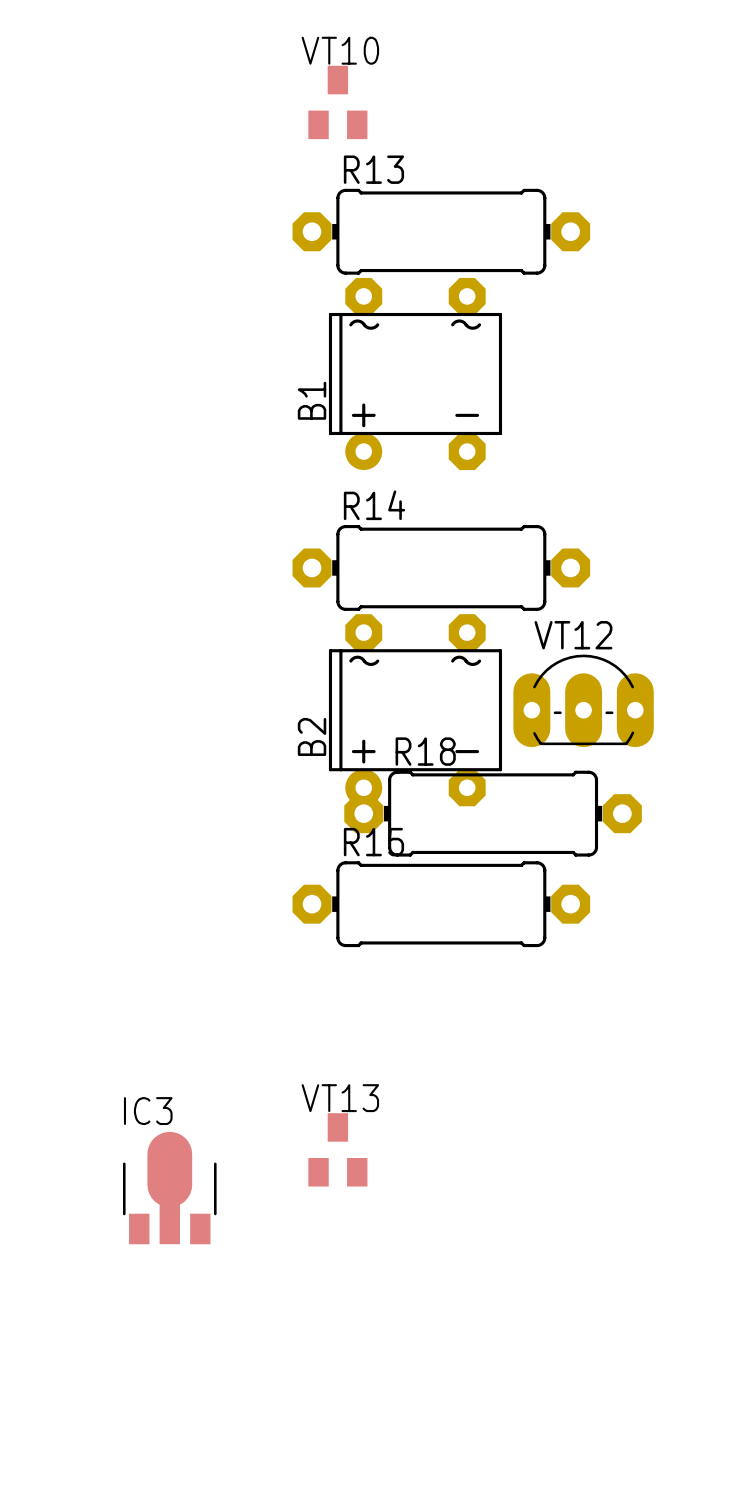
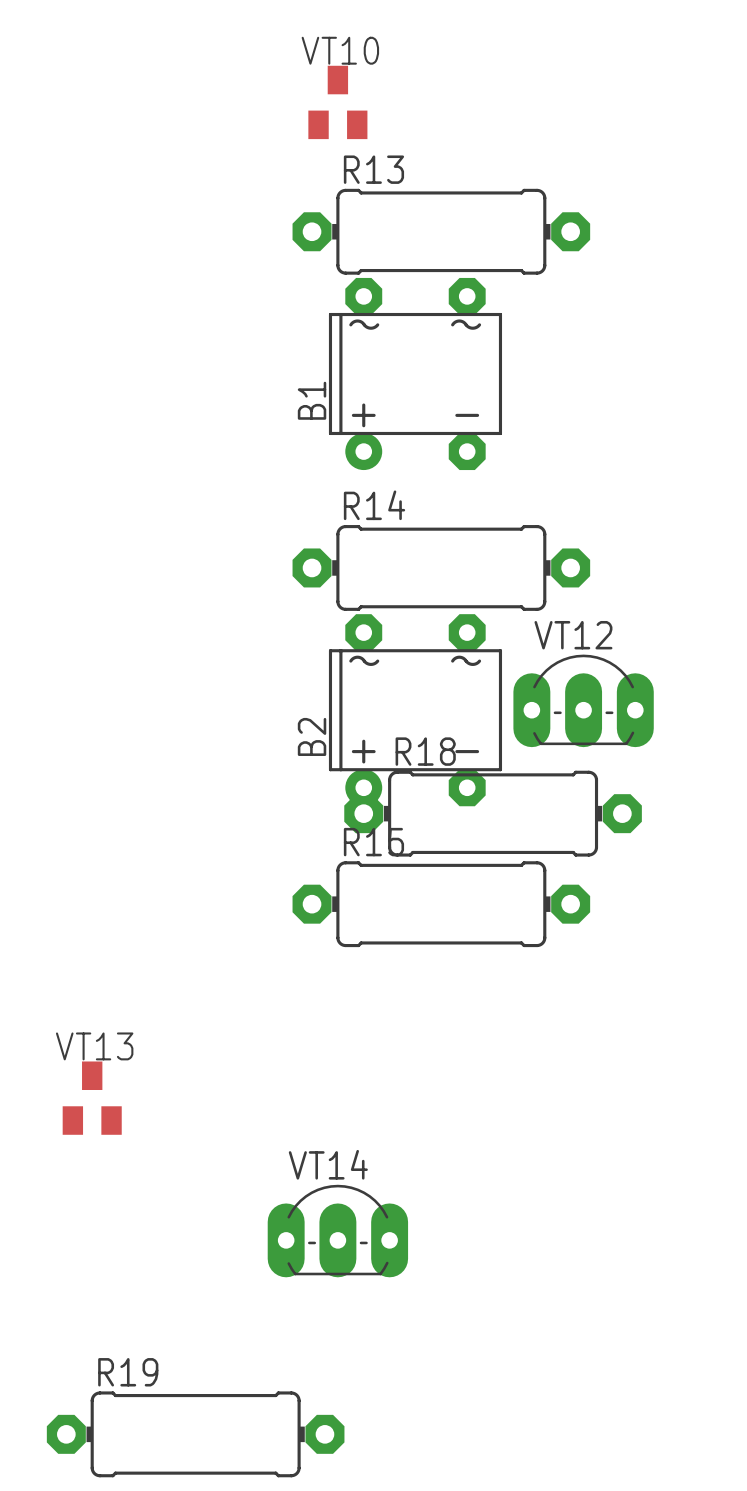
VT13 position: (337, 1149) -> (92, 1098)
IC3: (169, 1188) -> none
VT14: none -> (337, 1231)
R19: none -> (195, 1434)

